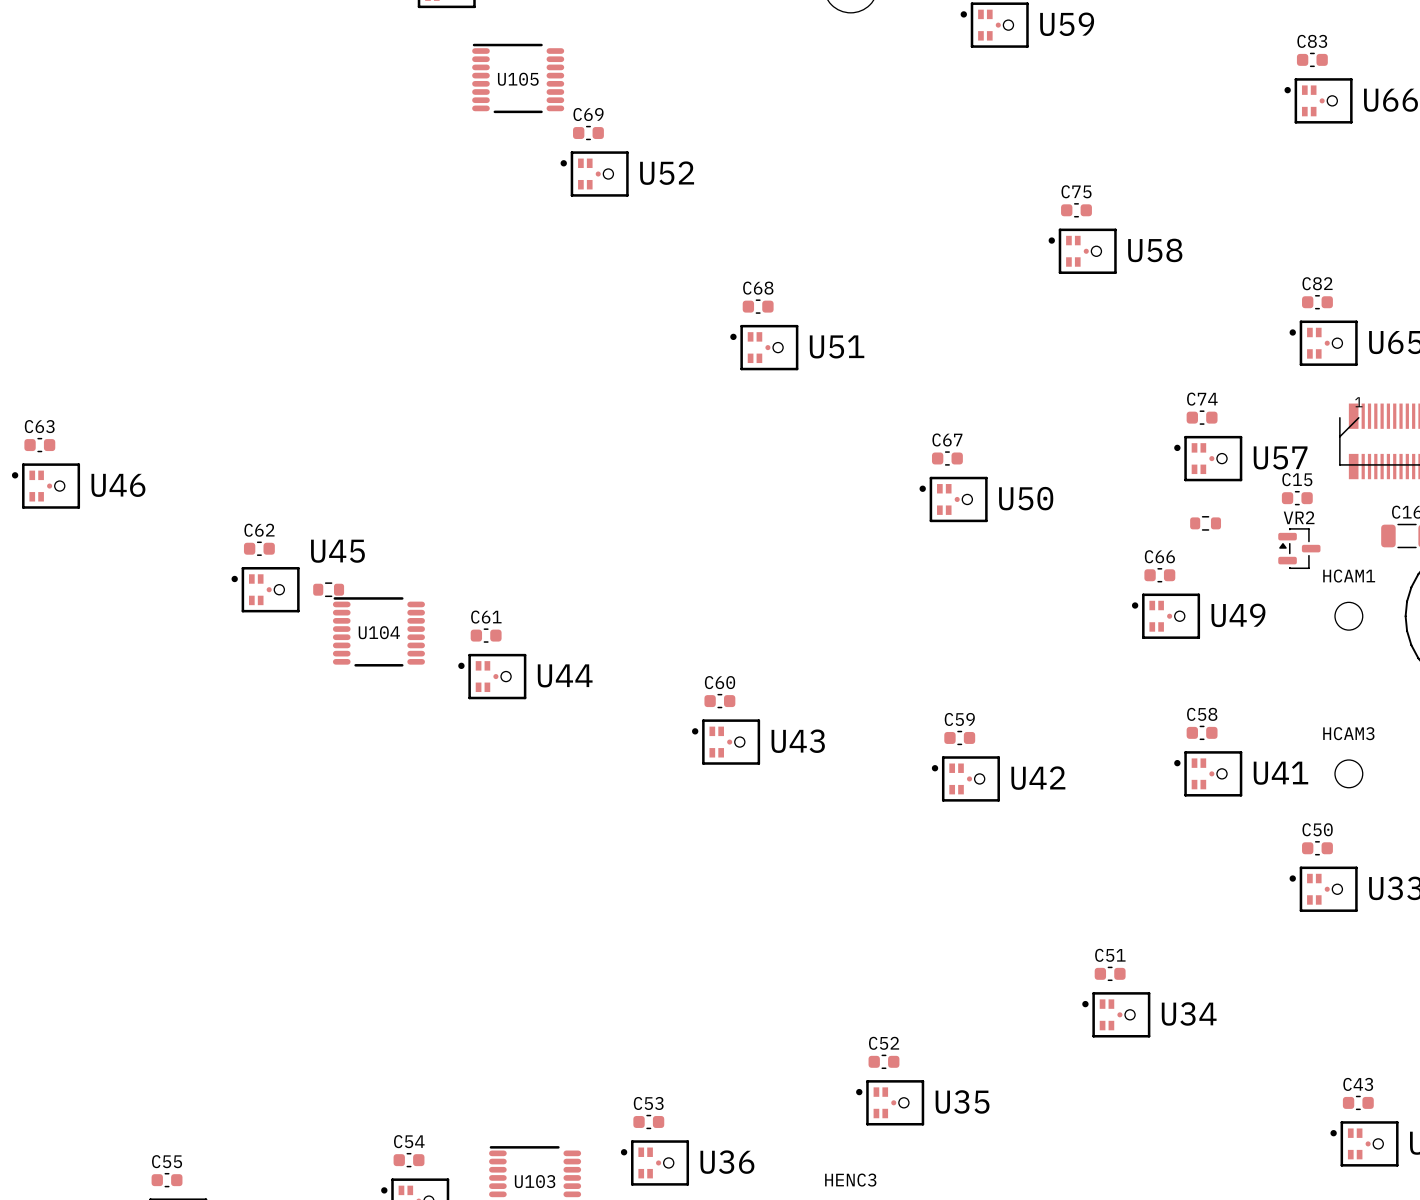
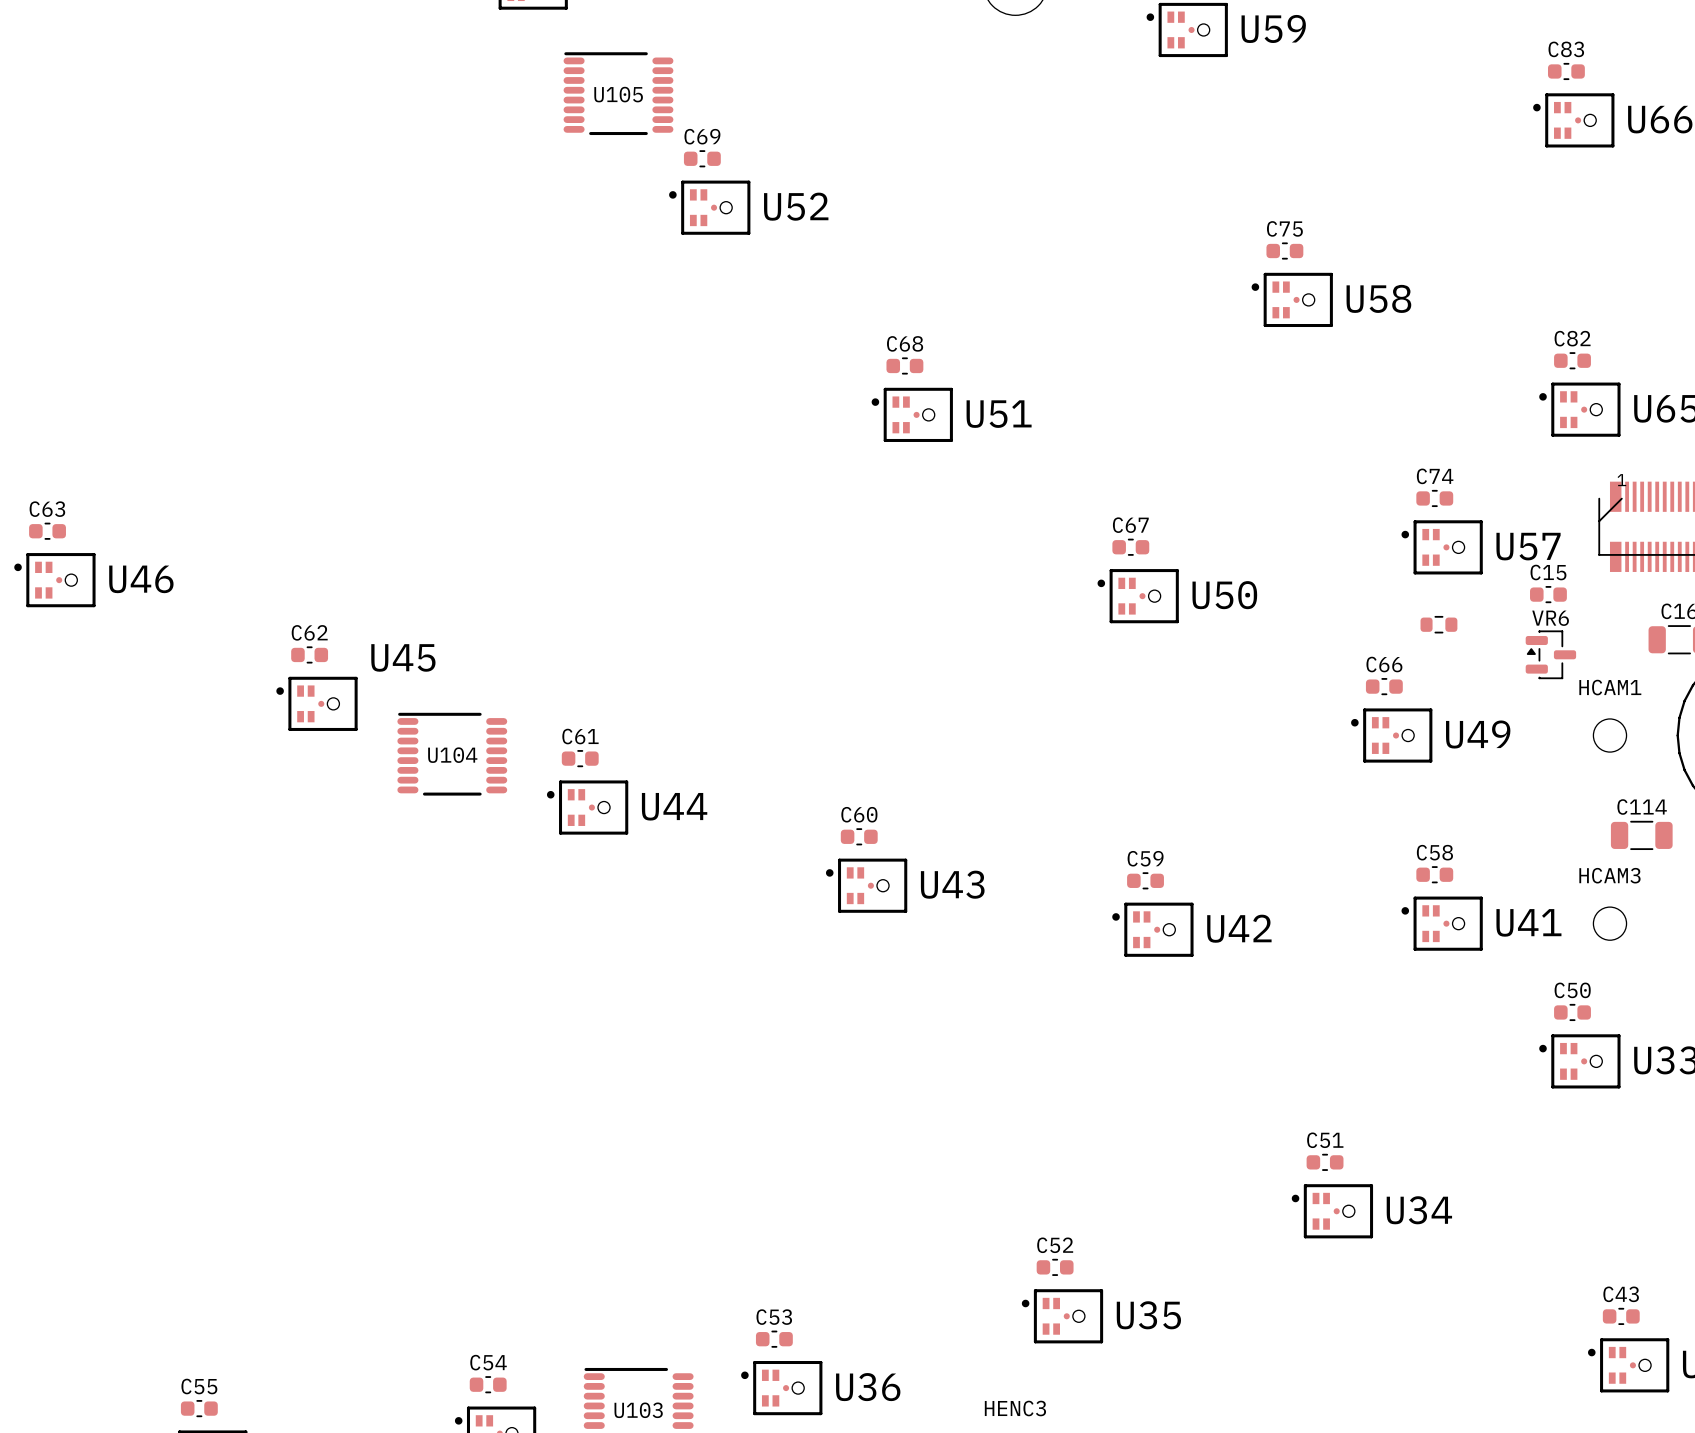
VR2 name: VR2 (1299, 517) -> VR6 (1550, 618)
part: (328, 589) -> none
C114: none -> (1641, 835)

